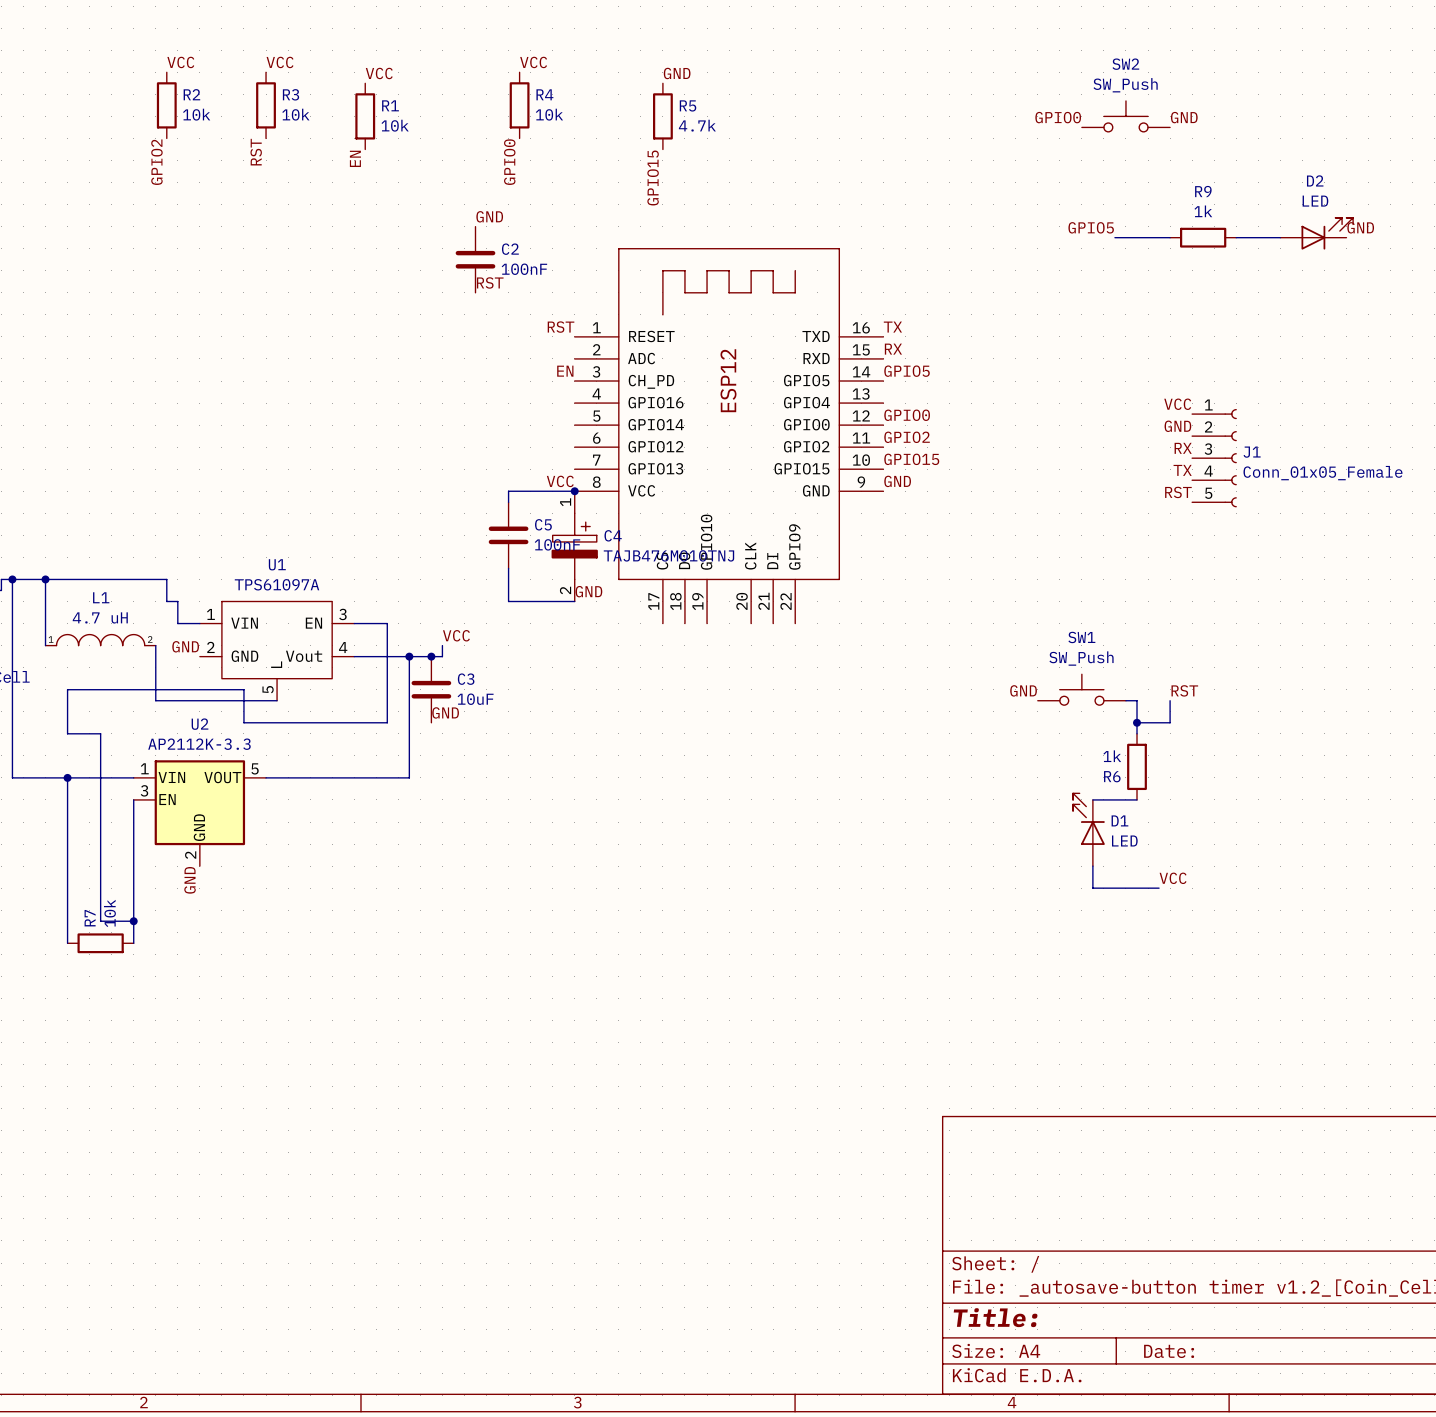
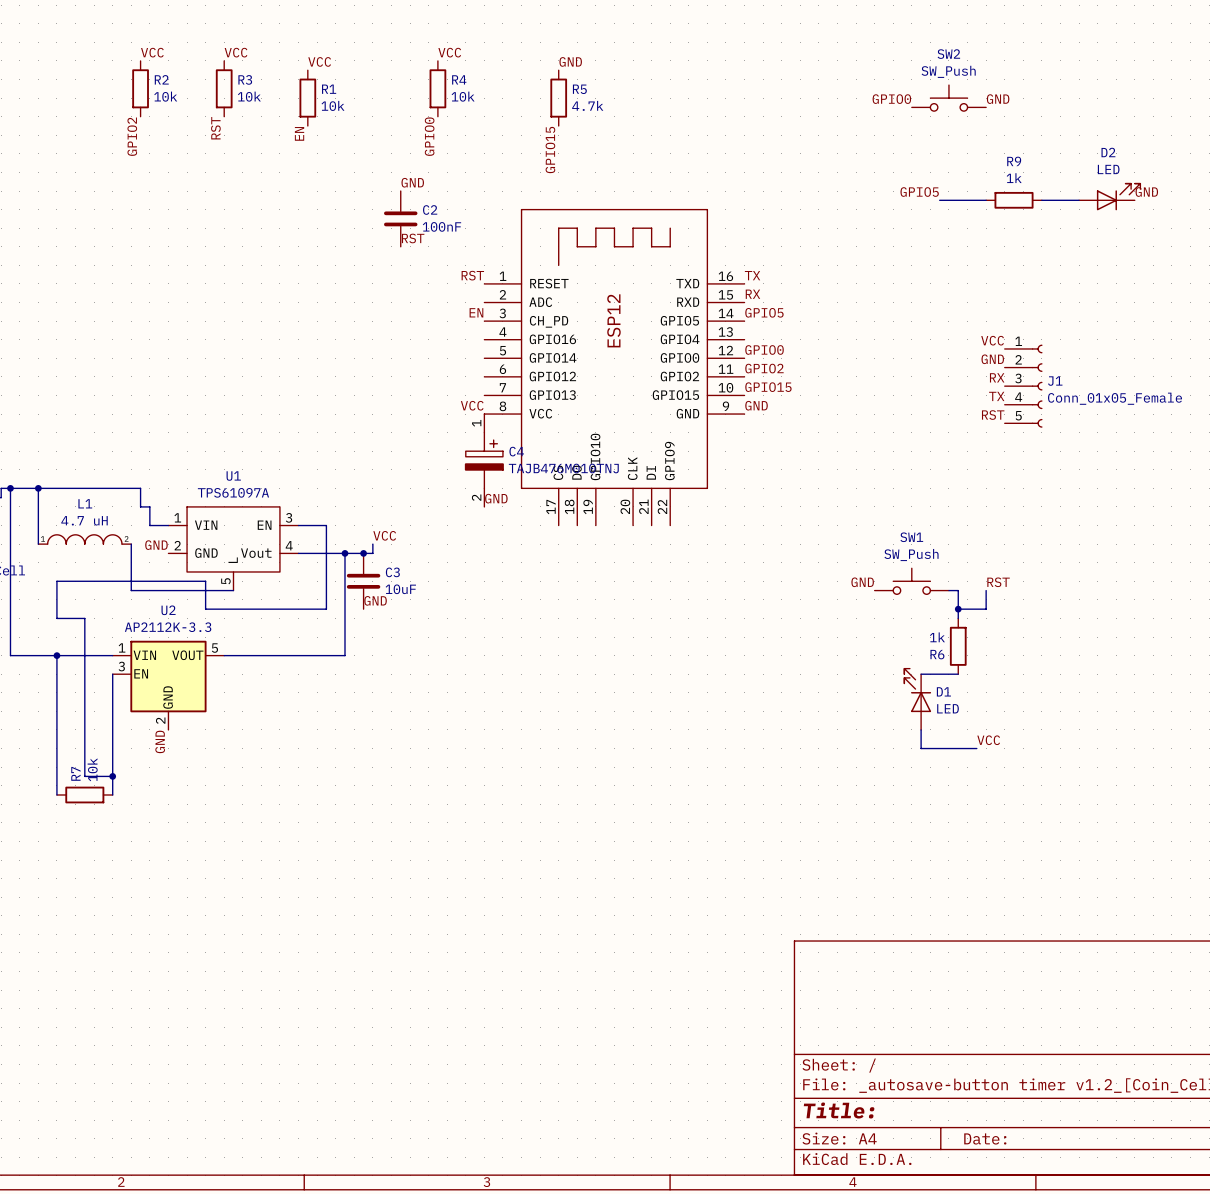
wire: (574, 491) (508, 491) (508, 502) -> none
junction: (574, 491) -> none
C5: 100nF (508, 535) -> none
wire: (508, 568) (508, 601) (574, 601) -> none

